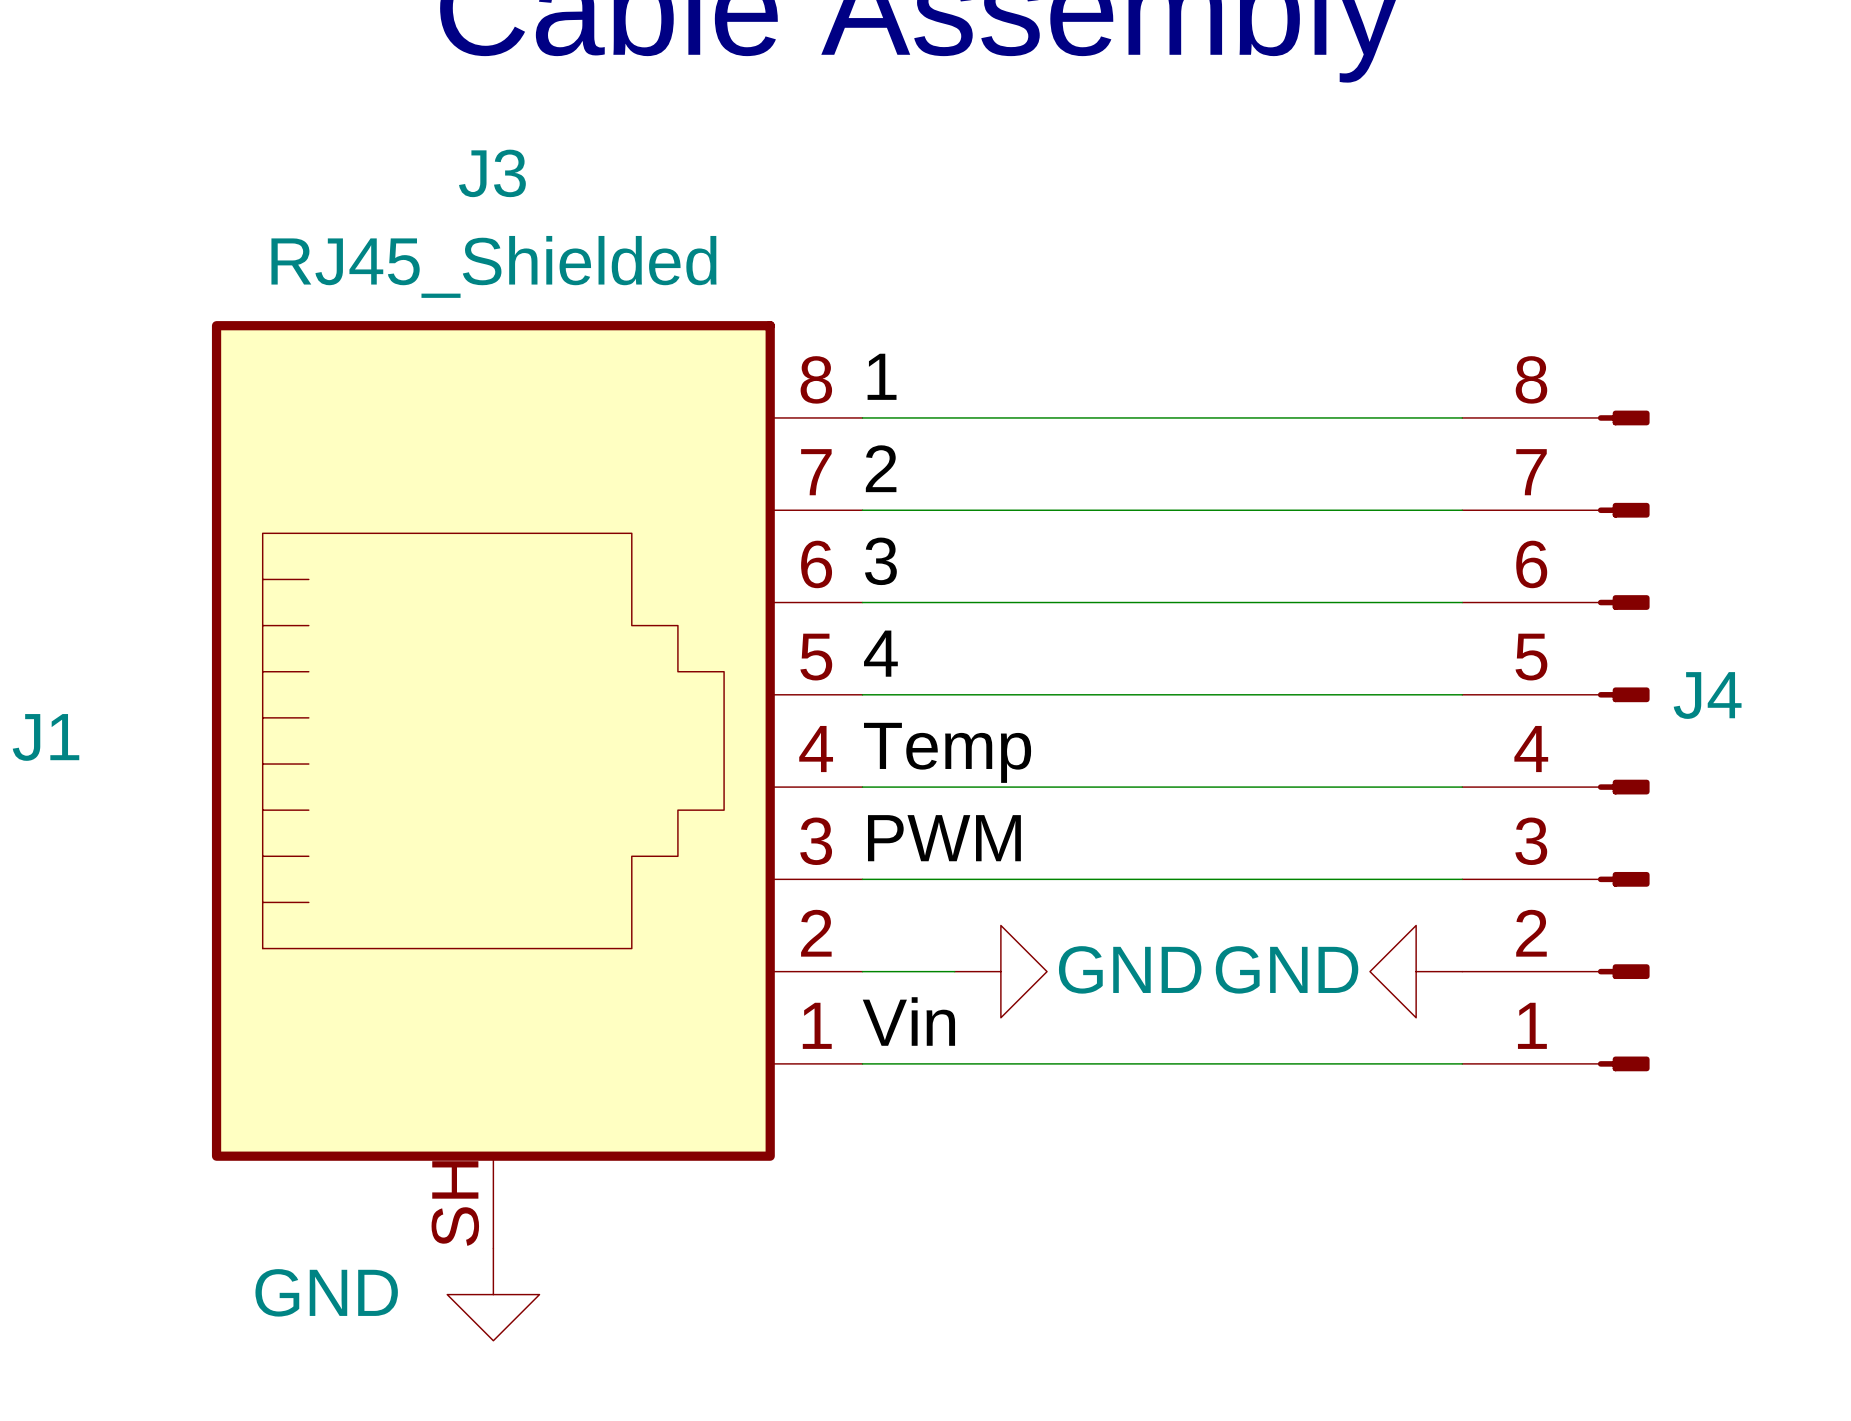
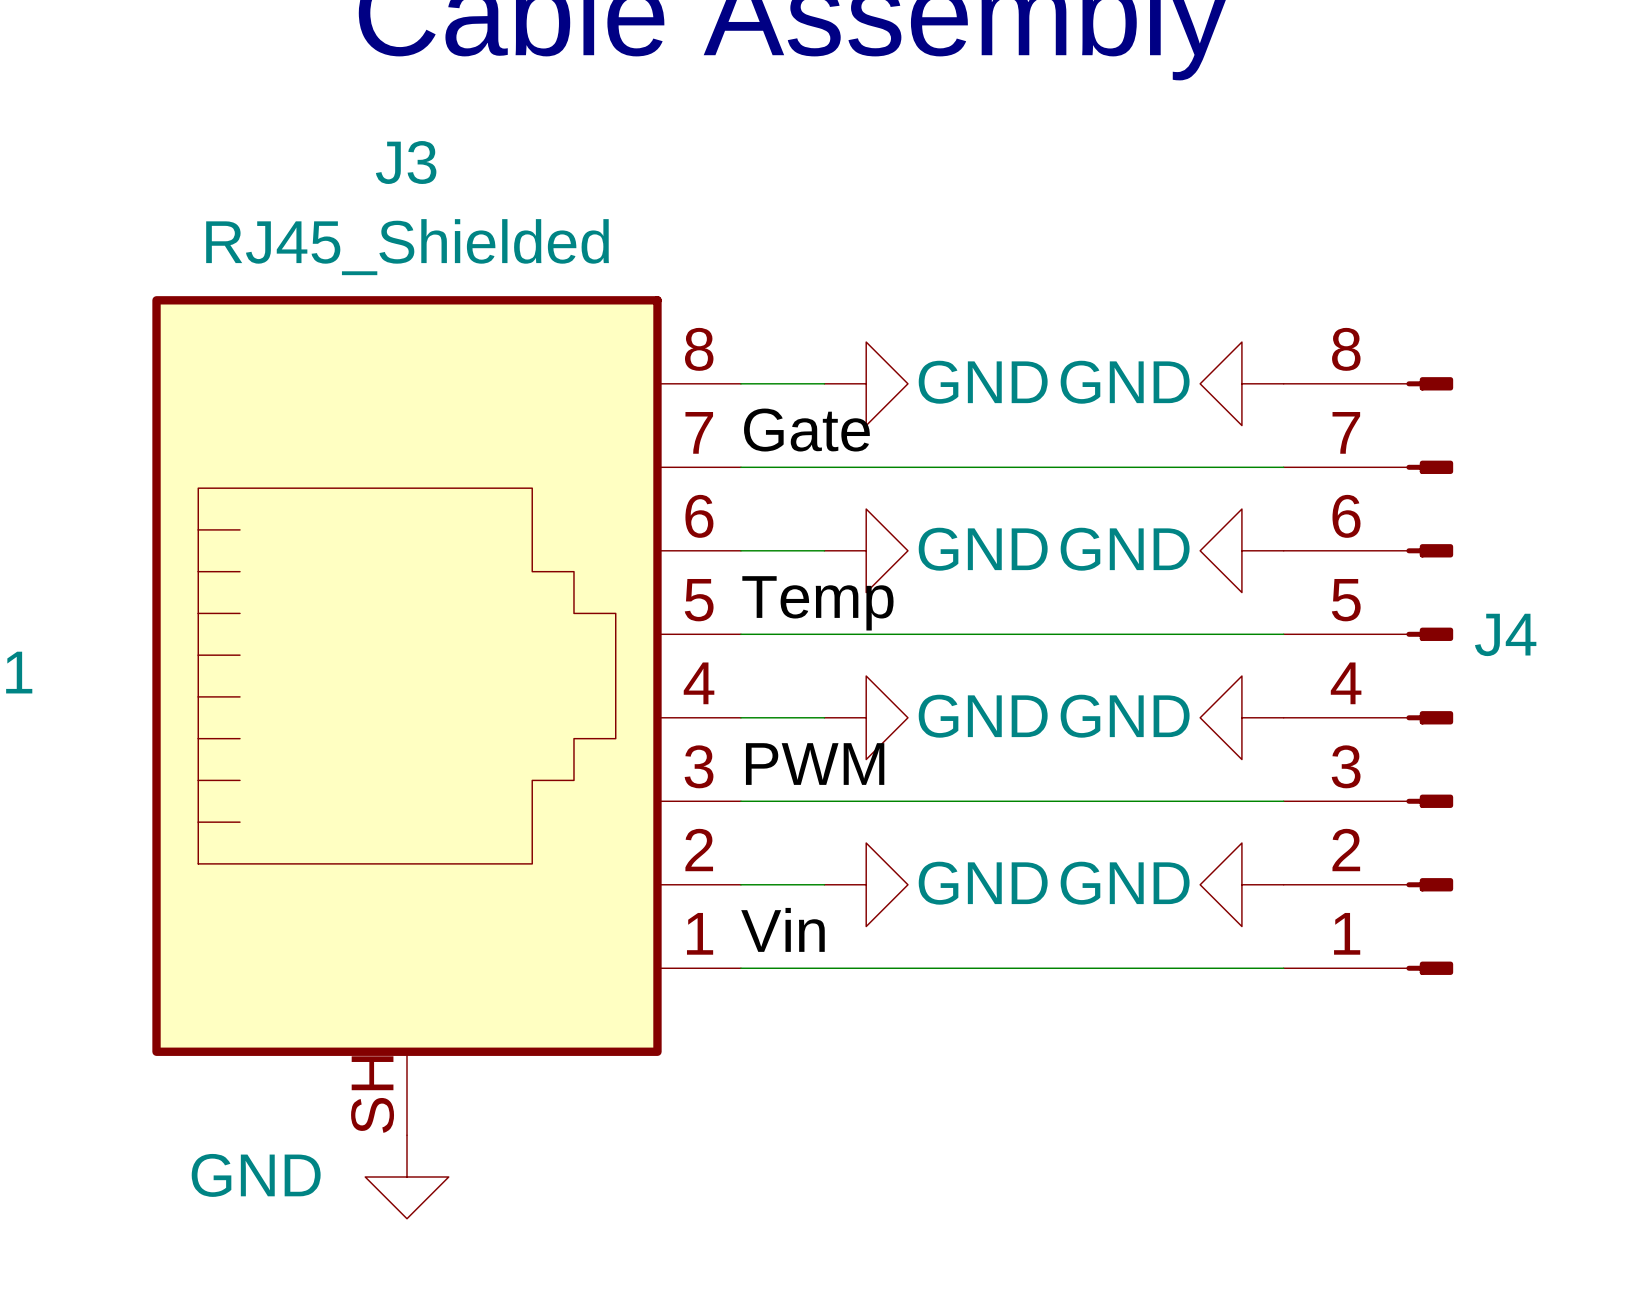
label: 1 (882, 376) -> none
wire: (954, 417) (1462, 417) -> none
power symbol: none -> GND (866, 383)
power symbol: none -> GND (1241, 383)
label: 2 (881, 468) -> Gate (806, 430)
label: 3 (880, 561) -> none
wire: (954, 602) (1462, 602) -> none
power symbol: none -> GND (866, 550)
power symbol: none -> GND (1241, 550)
label: 4 (880, 653) -> Temp (817, 603)
label: Temp (947, 752) -> none
wire: (954, 787) (1462, 787) -> none
power symbol: none -> GND (866, 717)
power symbol: none -> GND (1241, 717)

